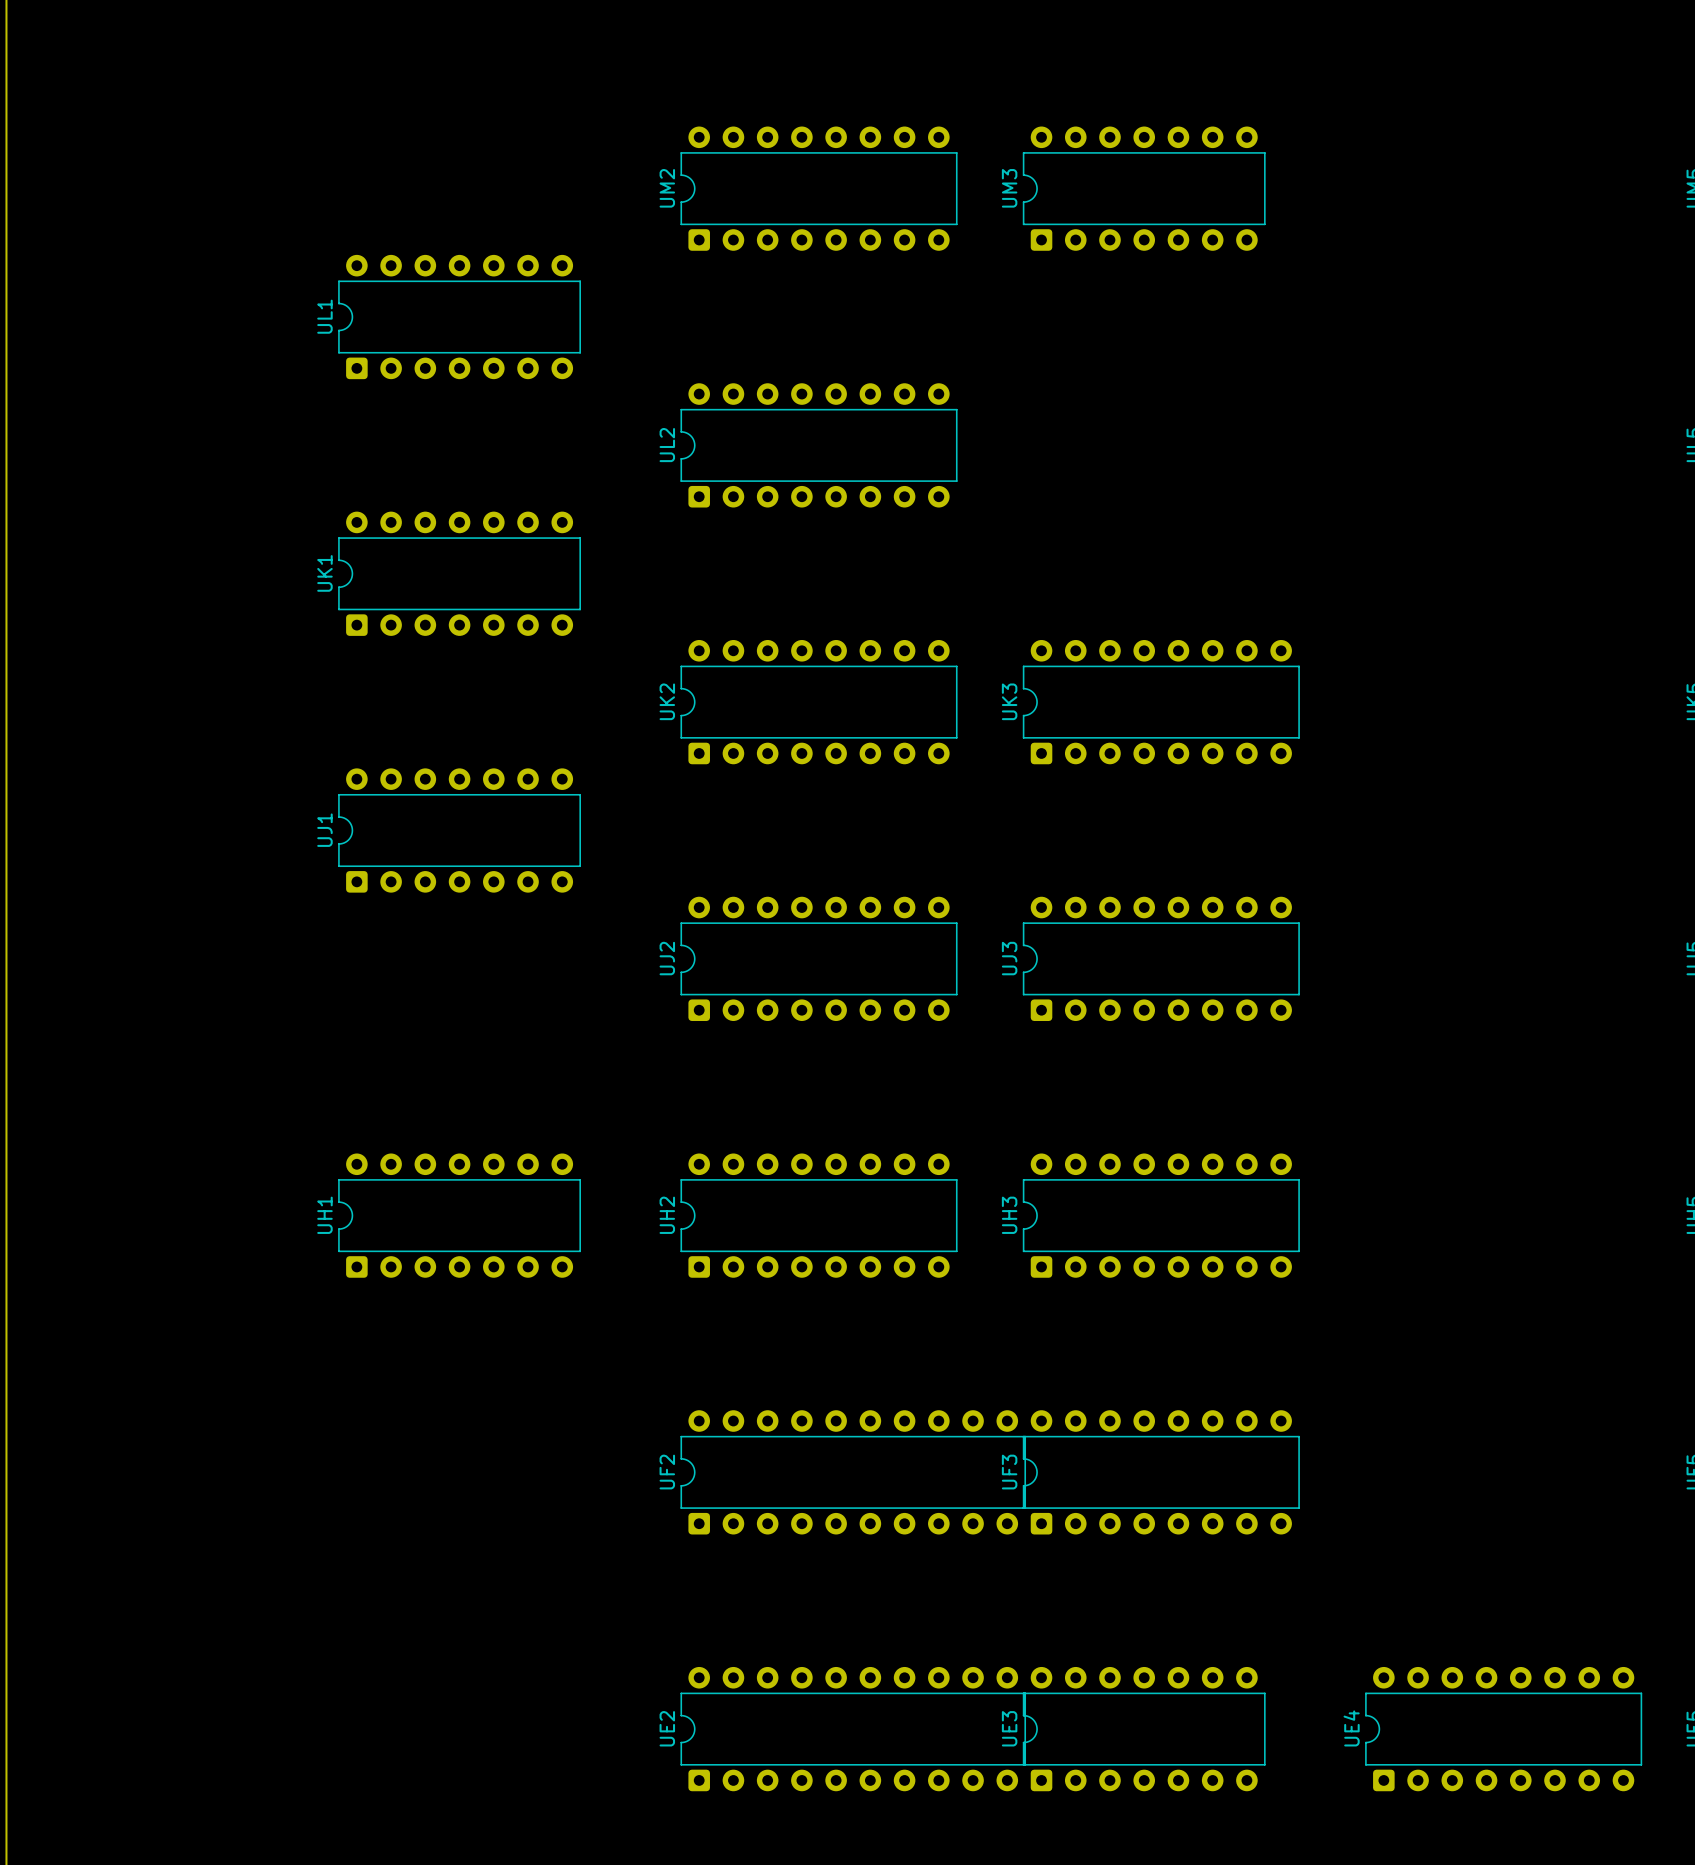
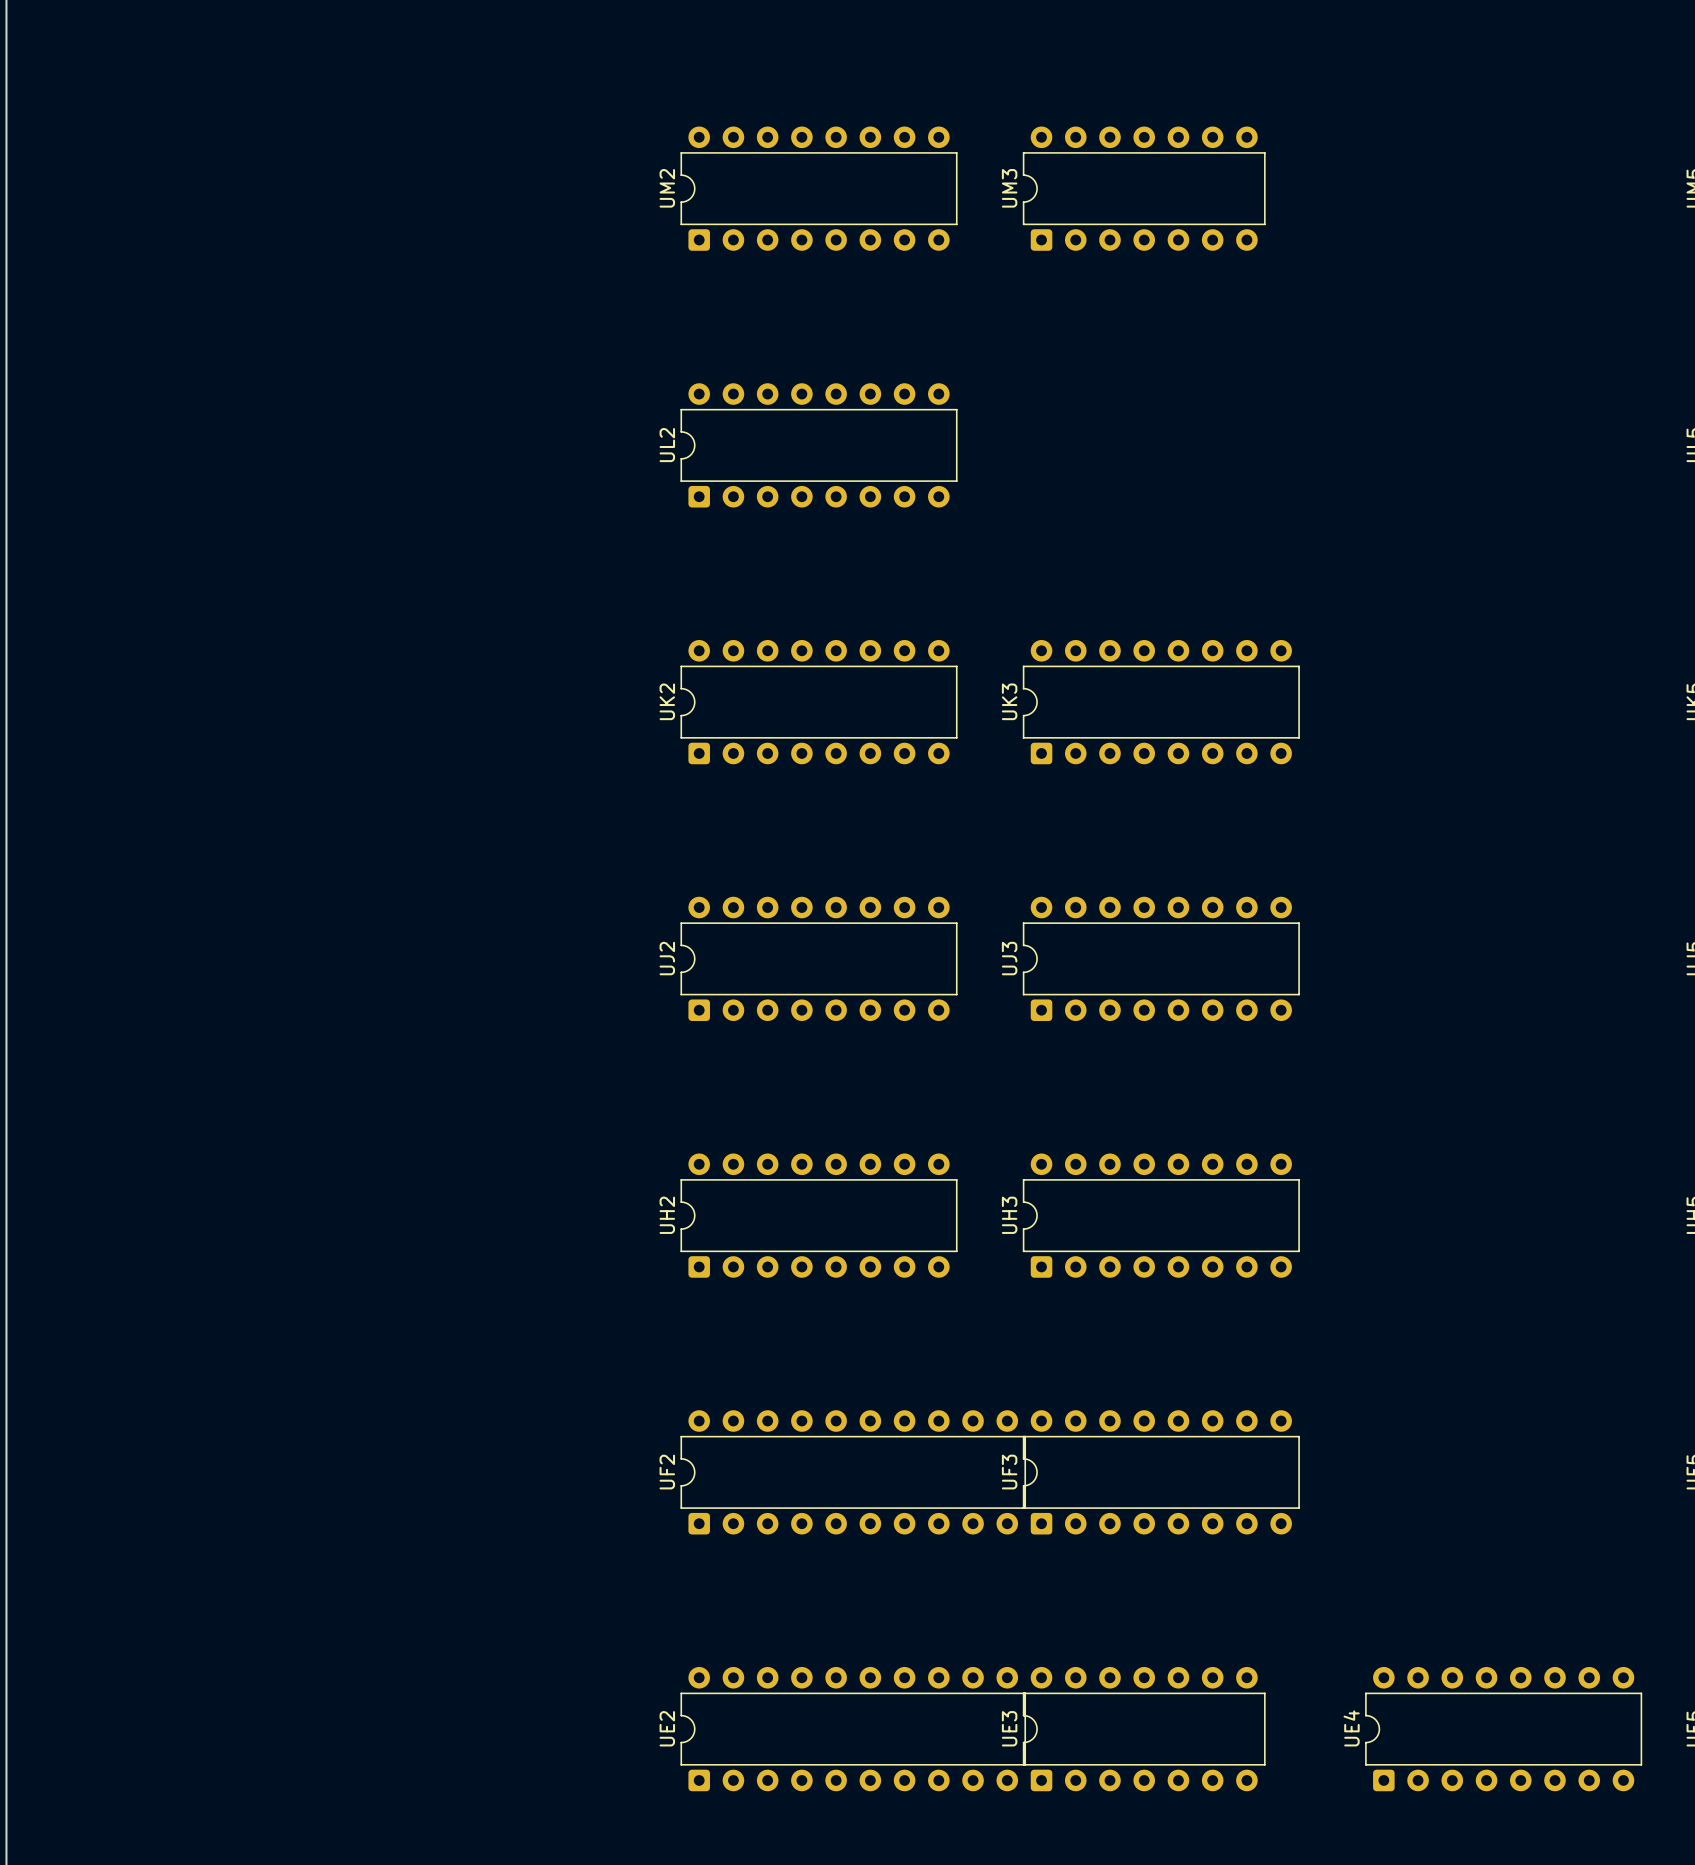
UL1: (459, 317) -> none
UK1: (459, 573) -> none
UJ1: (459, 830) -> none
UH1: (459, 1215) -> none

